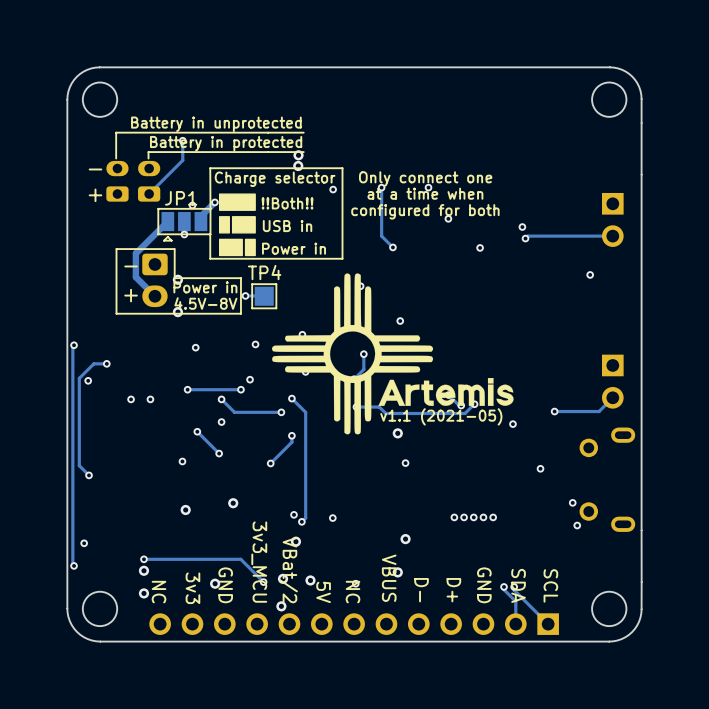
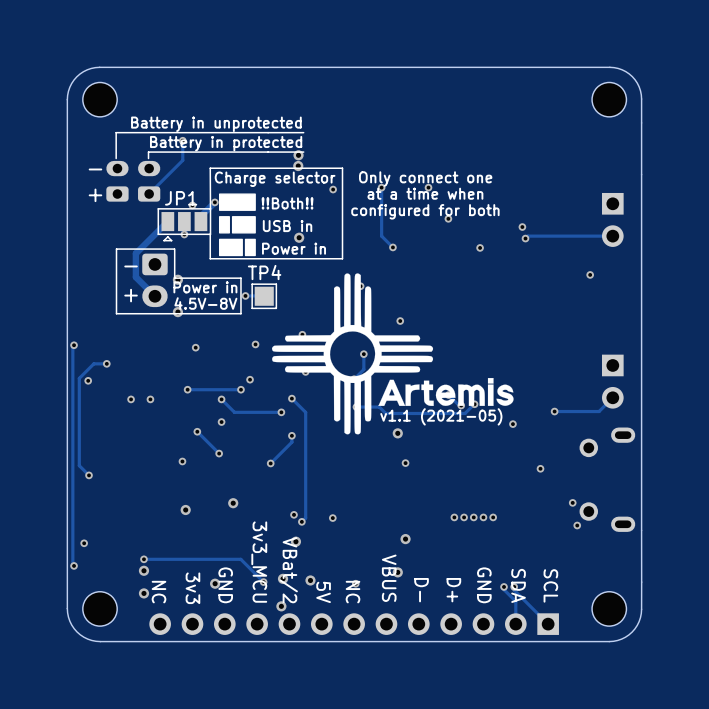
via: none -> (299, 237)

